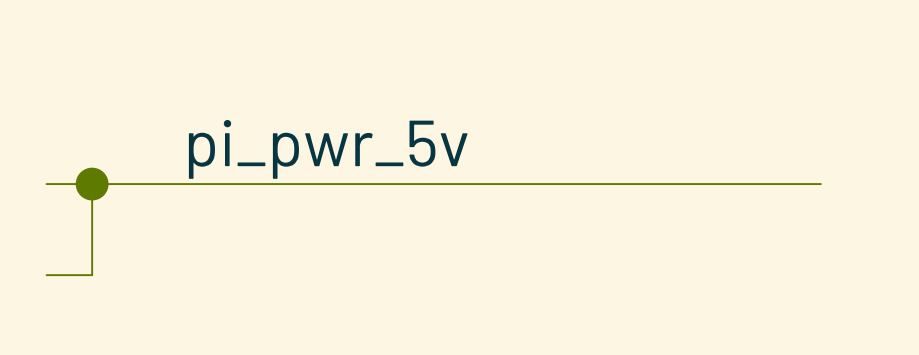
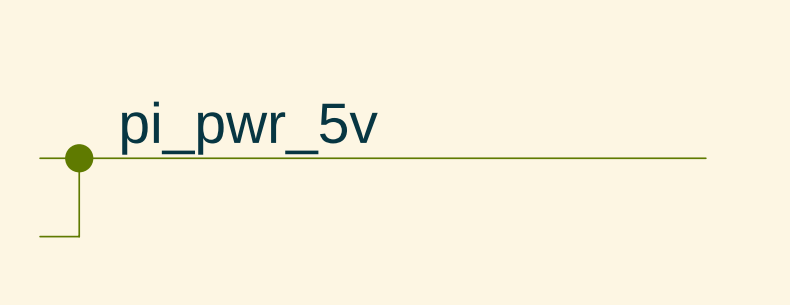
label position: pi_pwr_5v (328, 149) -> pi_pwr_5v (249, 128)

